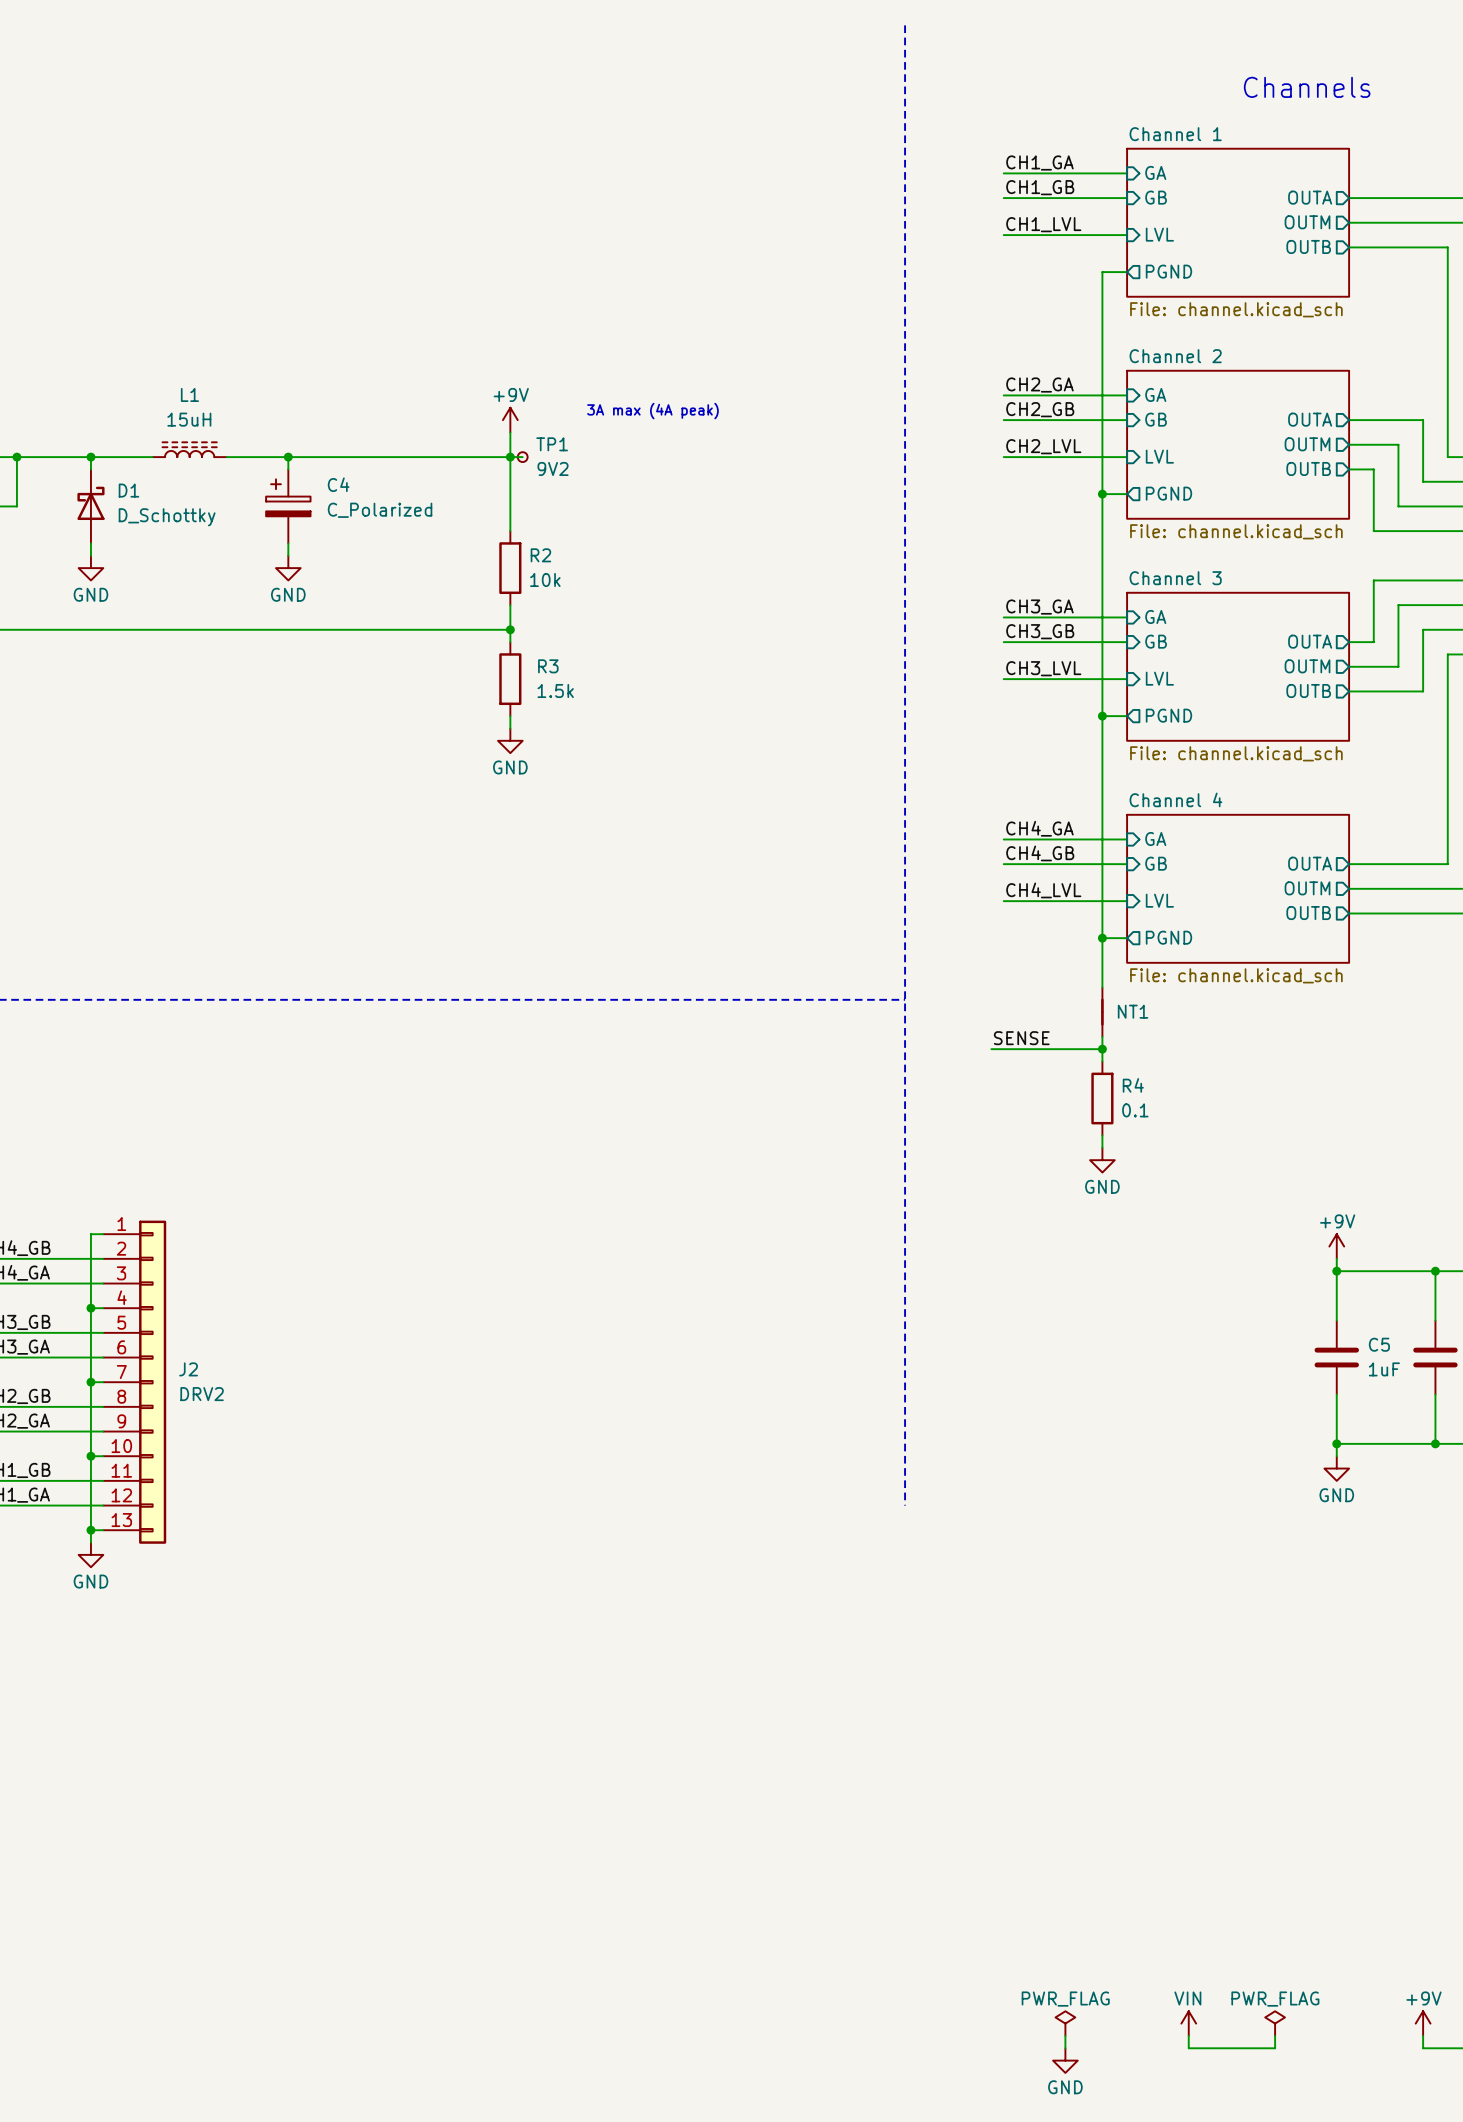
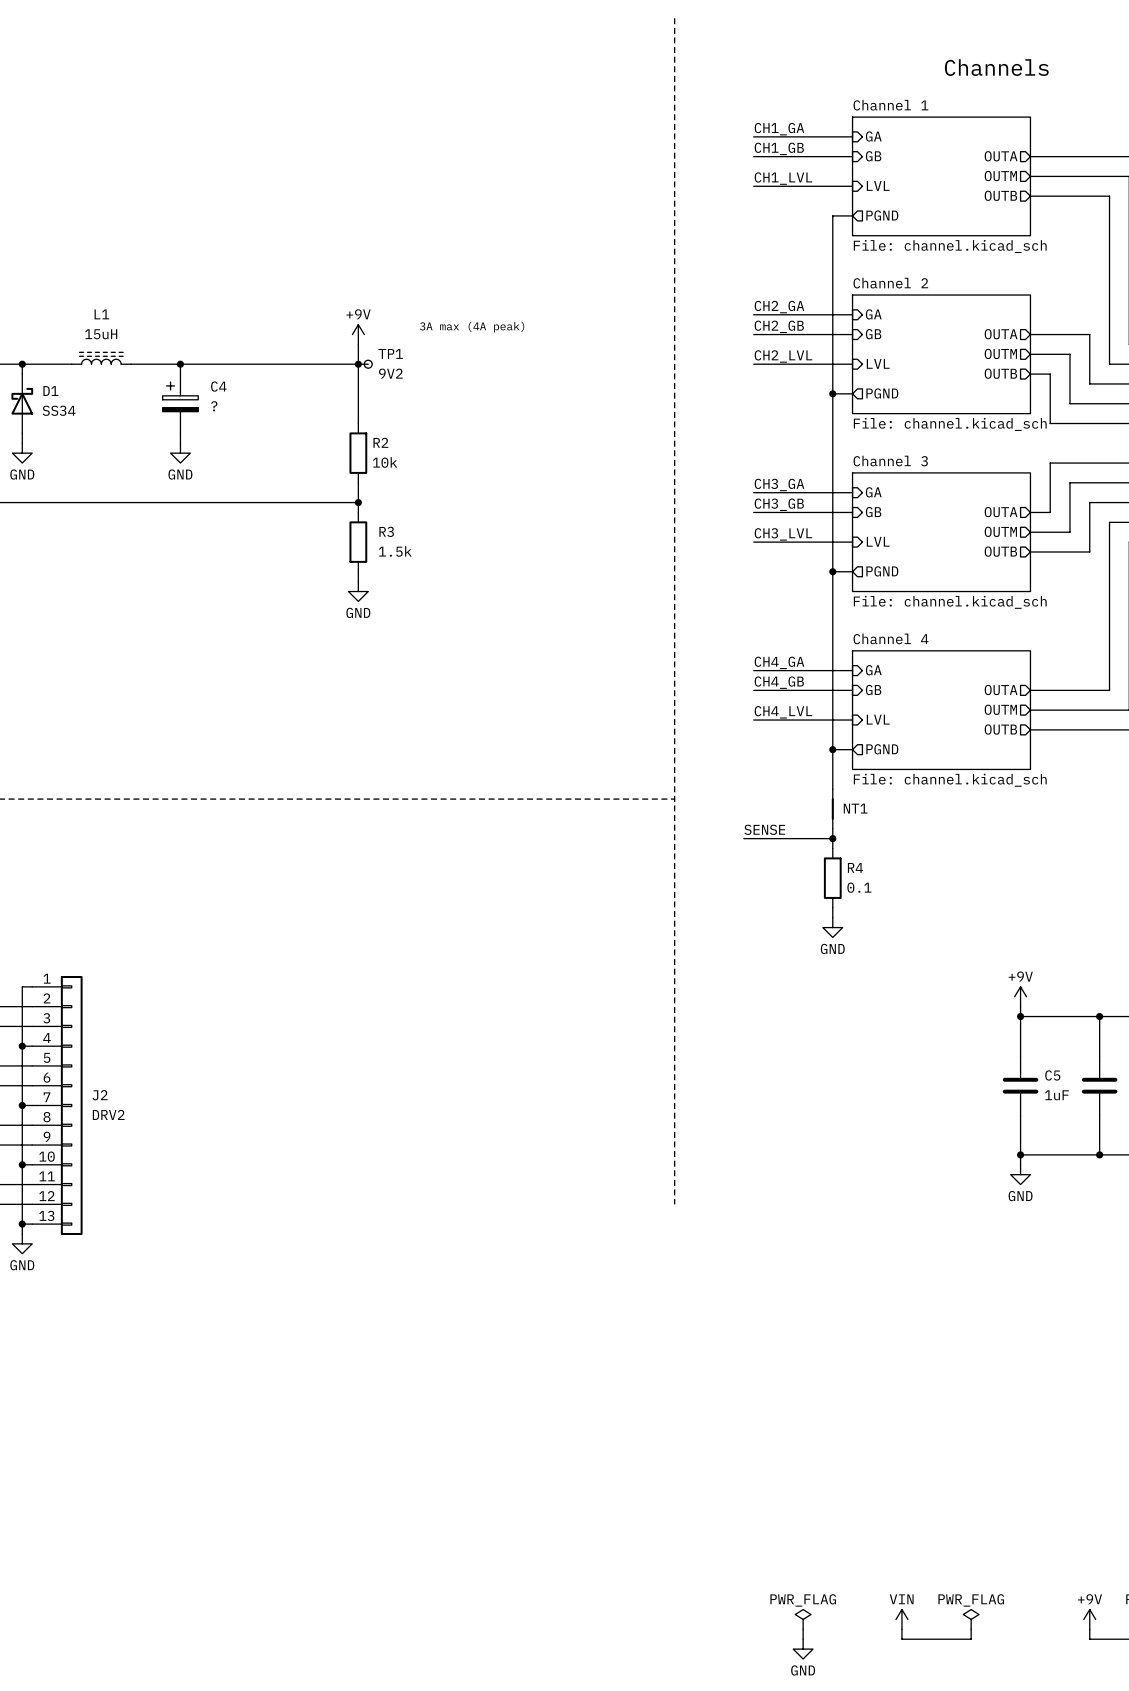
C4 value: C_Polarized (380, 510) -> ? (214, 406)
D1 value: D_Schottky (167, 517) -> SS34 (59, 410)

